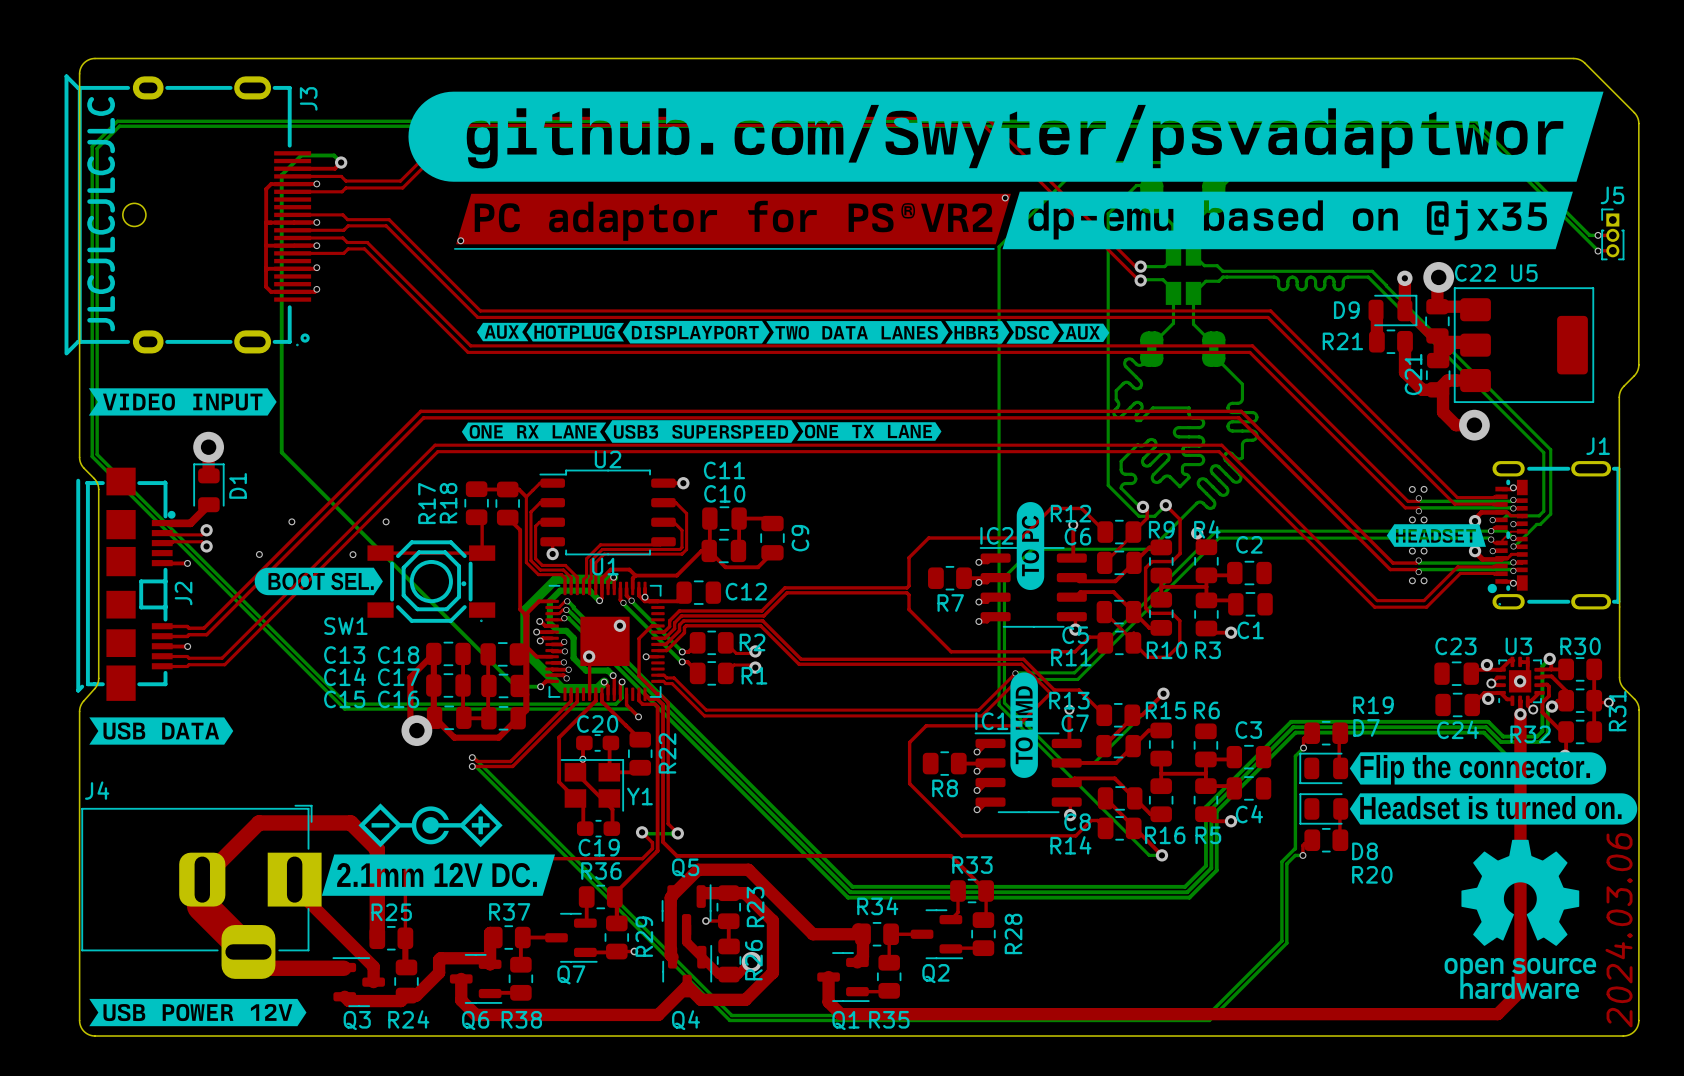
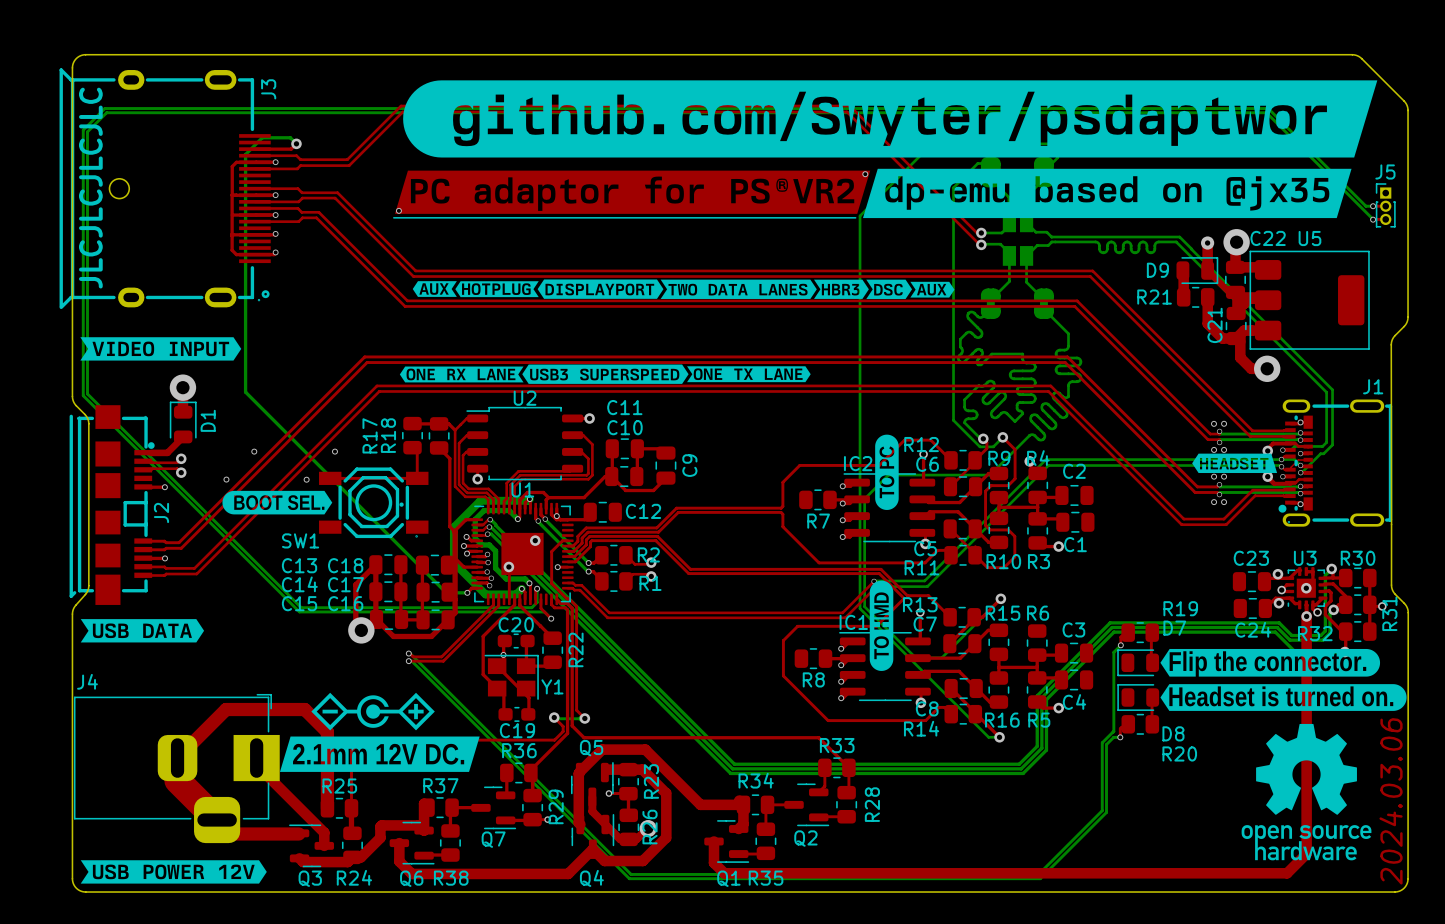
drawing: none -> [403, 80, 1378, 158]
drawing: [408, 91, 1604, 182] -> none

